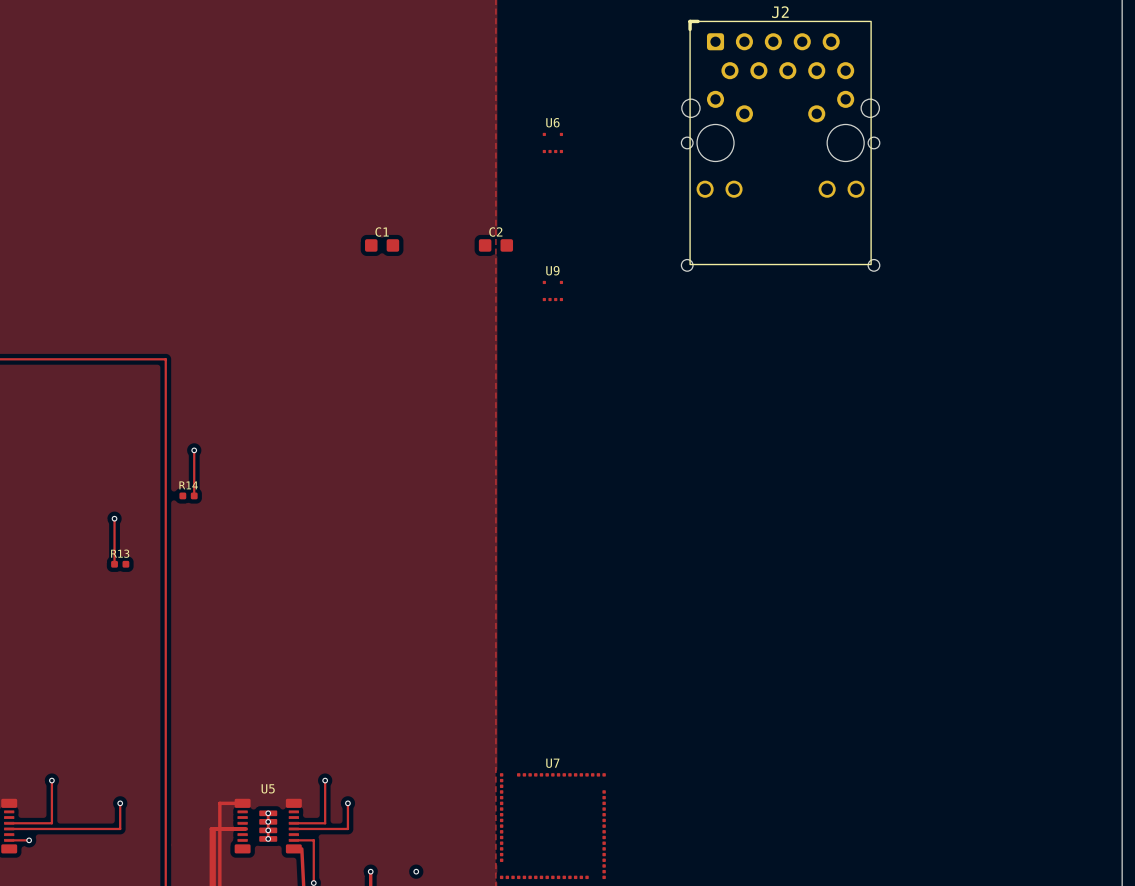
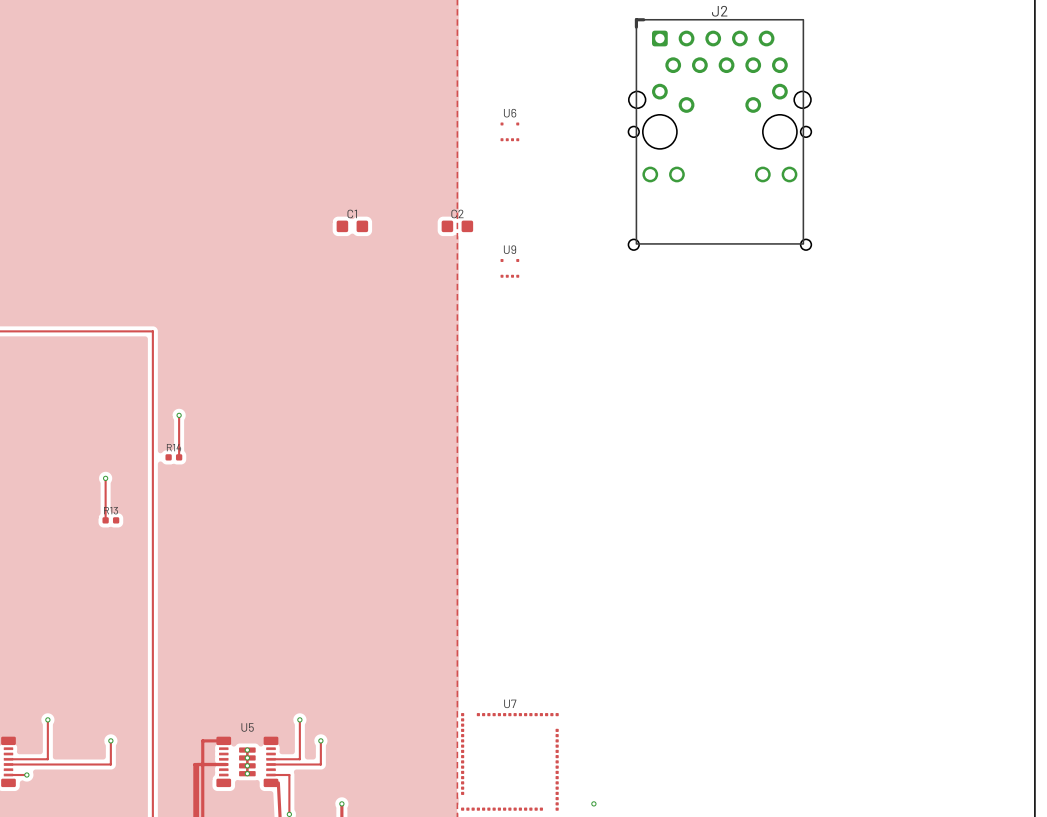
via: (416, 871) -> none
via: none -> (593, 803)

